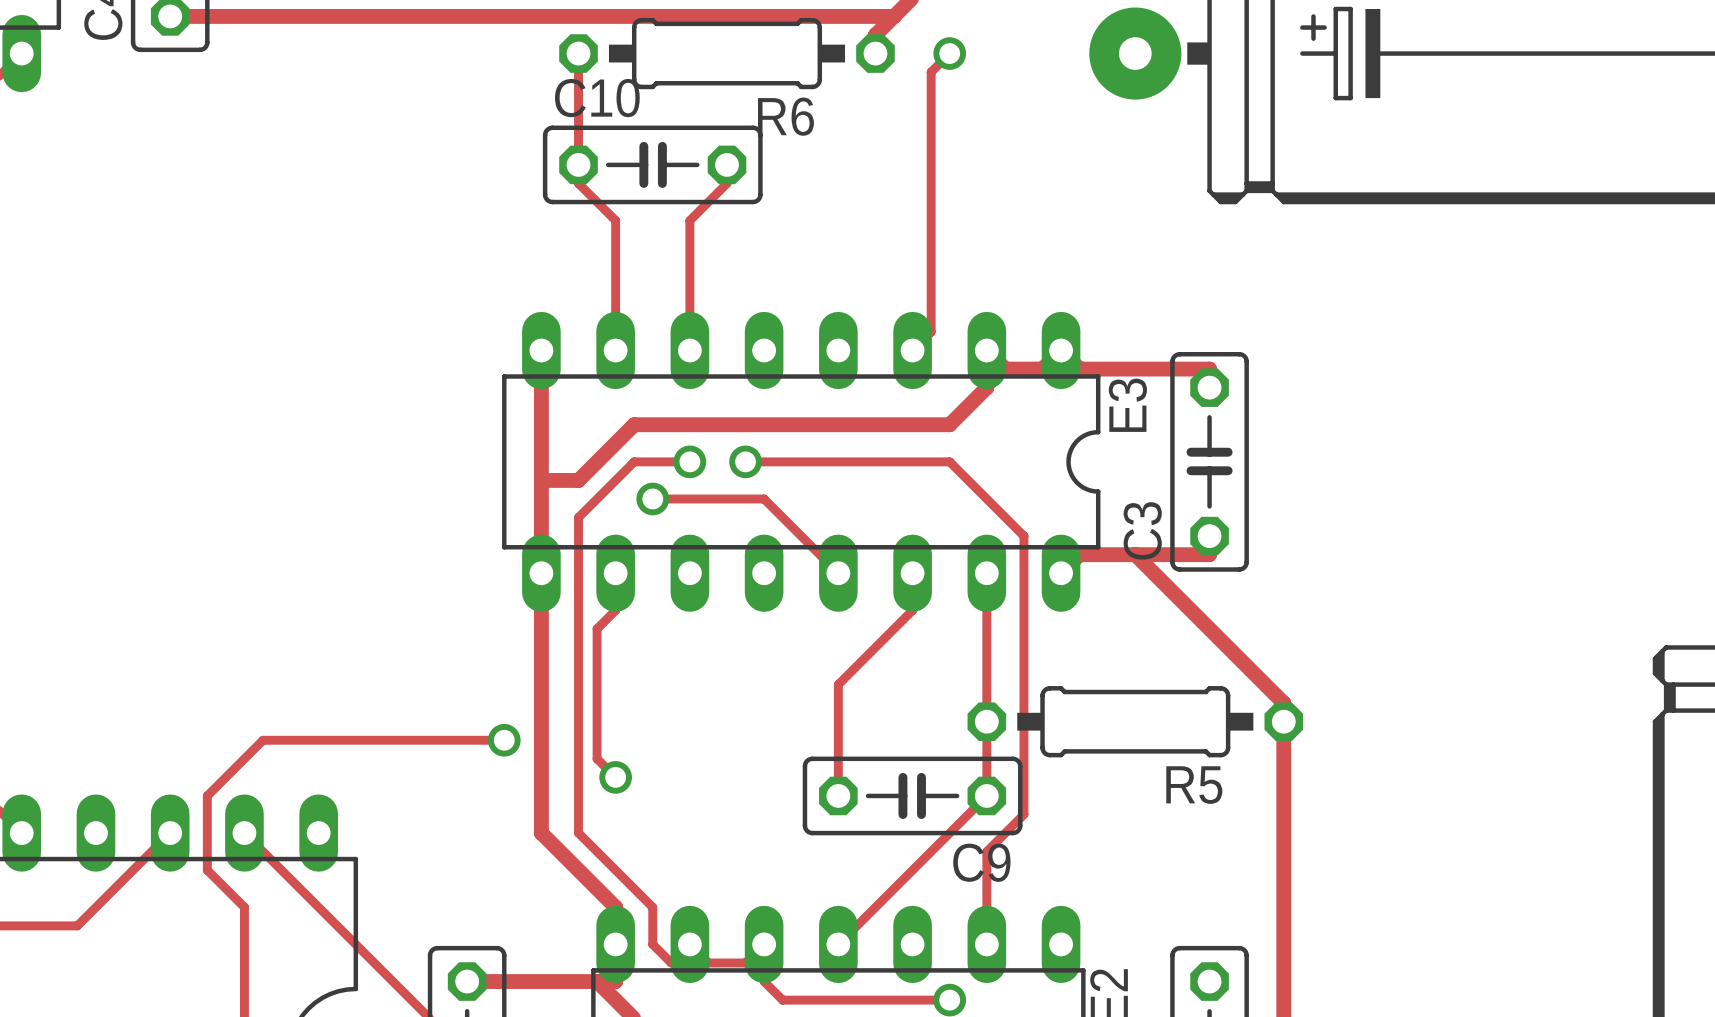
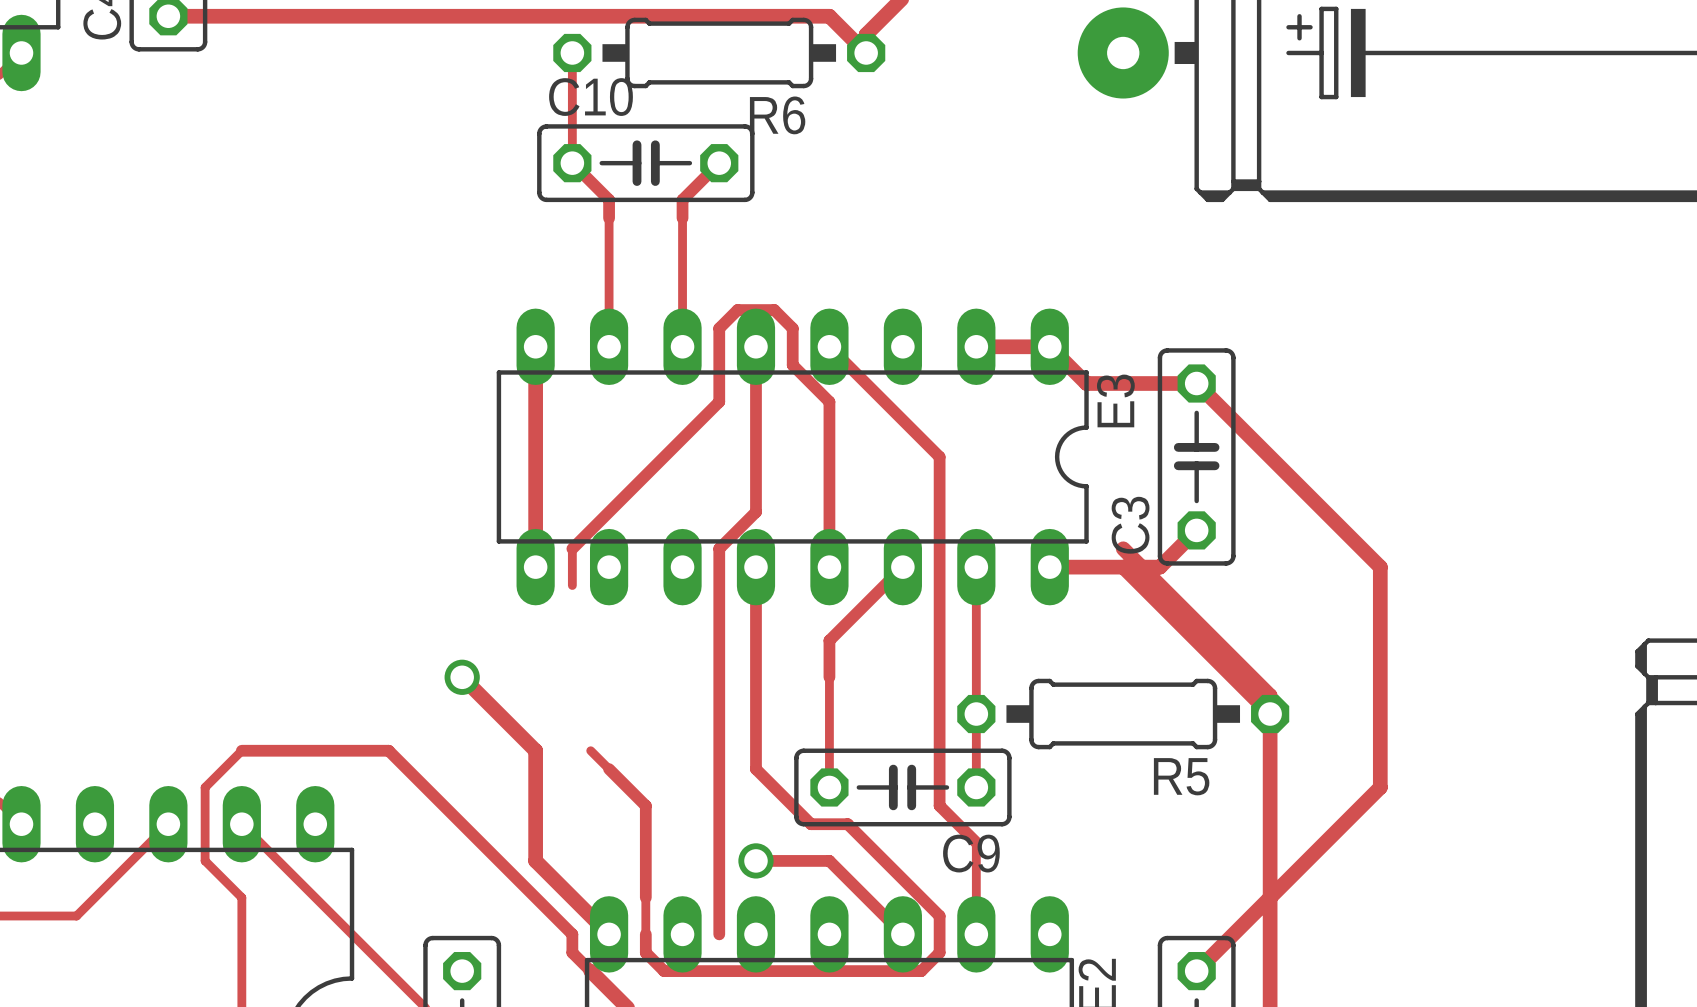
track: (838, 16) (894, 16) -> (829, 16) (866, 52)
track: (949, 53) (931, 72) (931, 331) (912, 350) -> none
via: (949, 53) -> none
track: (578, 164) (578, 183) (615, 220) -> (572, 163) (609, 199) (609, 218)
track: (727, 164) (727, 183) (689, 220) -> (719, 163) (682, 199) (682, 218)
track: none -> (755, 346) (755, 512) (719, 548) (719, 934)
track: (1061, 350) (1042, 369) (1005, 369) (986, 350) (986, 387) (949, 424) (634, 424) (578, 480) (541, 480) -> (1049, 346) (976, 346)
track: (1079, 369) (1209, 369) (1209, 387) -> (1068, 365) (1086, 383) (1196, 383) (1380, 567) (1380, 787) (1196, 971)
track: (689, 461) (634, 461) (578, 517) (578, 554) -> none
via: (689, 461) -> none
track: (745, 461) (949, 461) (1023, 536) (1023, 814) (986, 851) -> (829, 346) (939, 456) (939, 805) (976, 842)
via: (745, 461) -> none
track: (652, 498) (764, 498) (838, 573) -> (572, 548) (719, 401) (719, 328) (737, 310) (774, 310) (792, 328) (792, 365) (829, 401) (829, 567)
via: (652, 498) -> none
track: (1209, 536) (1209, 554) (1079, 554) (1061, 573) -> (1196, 530) (1159, 567) (1049, 567)
track: (541, 573) (541, 758) -> (462, 677) (535, 750)
track: (615, 573) (615, 610) (597, 628) (597, 758) -> none
track: (912, 573) (912, 610) (838, 684) -> (902, 567) (829, 640) (829, 677)
track: none -> (1123, 567) (1270, 714)
track: (578, 591) (578, 833) (652, 907) -> (609, 769) (645, 805) (645, 897)
via: none -> (462, 677)
track: (504, 740) (263, 740) (244, 758) -> (590, 971) (572, 952) (572, 934) (388, 750) (241, 750)
via: (504, 740) -> none
via: (615, 777) -> none
track: (986, 795) (838, 944) -> none
track: (541, 833) (615, 907) (615, 981) (467, 981) -> (535, 824) (535, 860) (609, 934)
track: none -> (755, 860) (829, 860) (902, 934)
via: none -> (755, 860)
track: (652, 944) (671, 962) (689, 944) (708, 962) (745, 962) (764, 944) (764, 981) (782, 1000) (949, 1000) -> (645, 934) (645, 952) (664, 971) (921, 971) (939, 952) (939, 916) (847, 824) (811, 824) (755, 769) (755, 567)
via: (949, 1000) -> none

